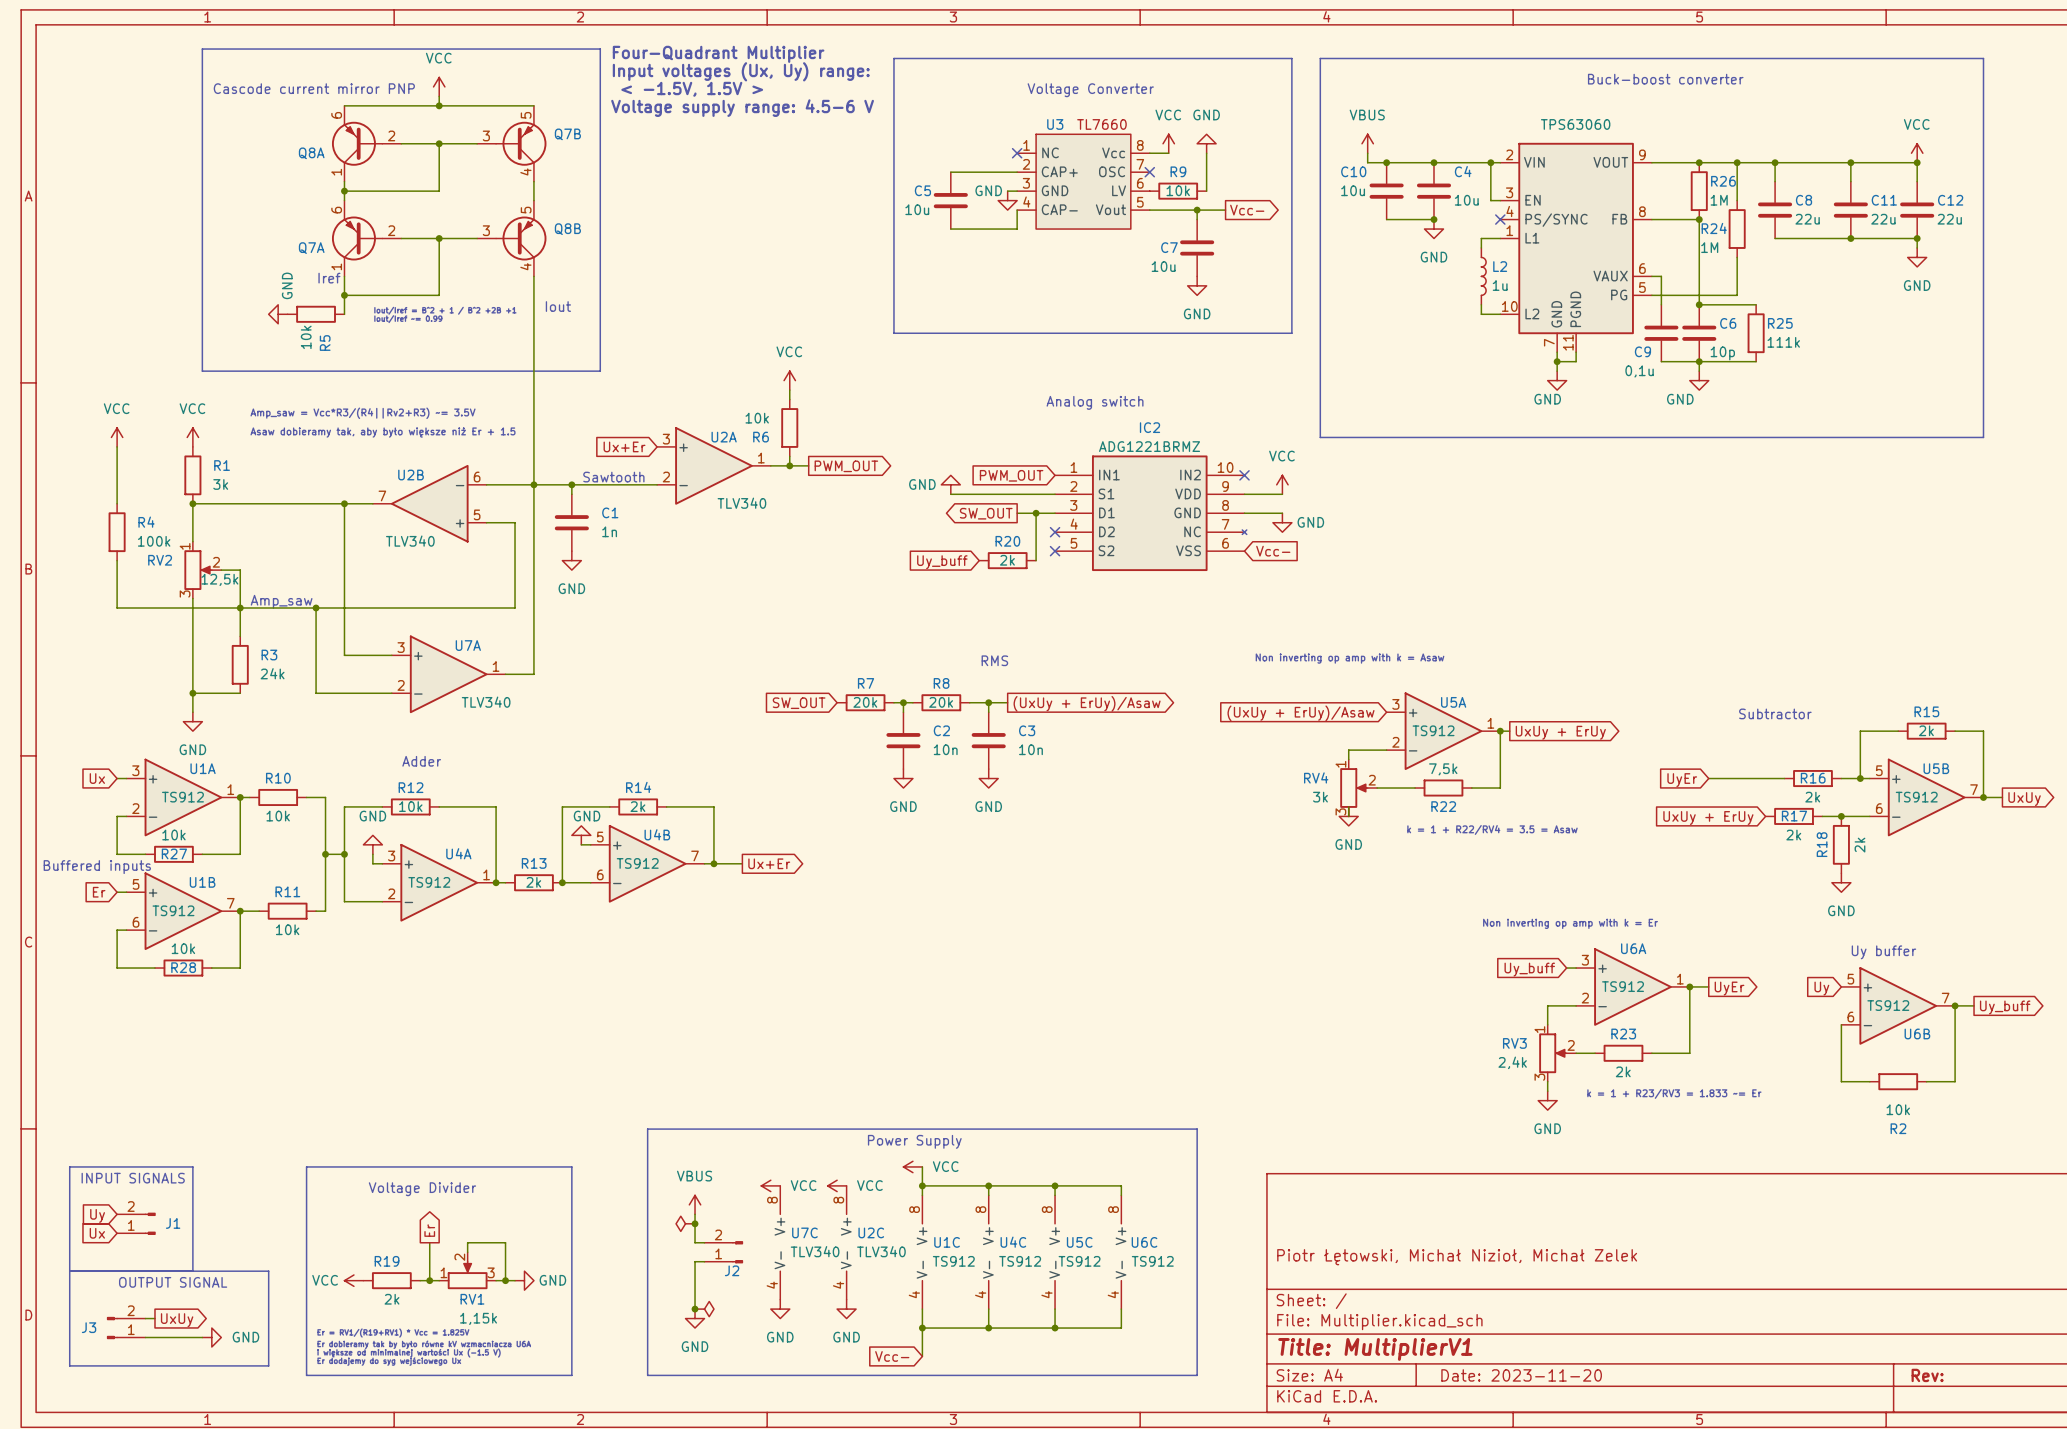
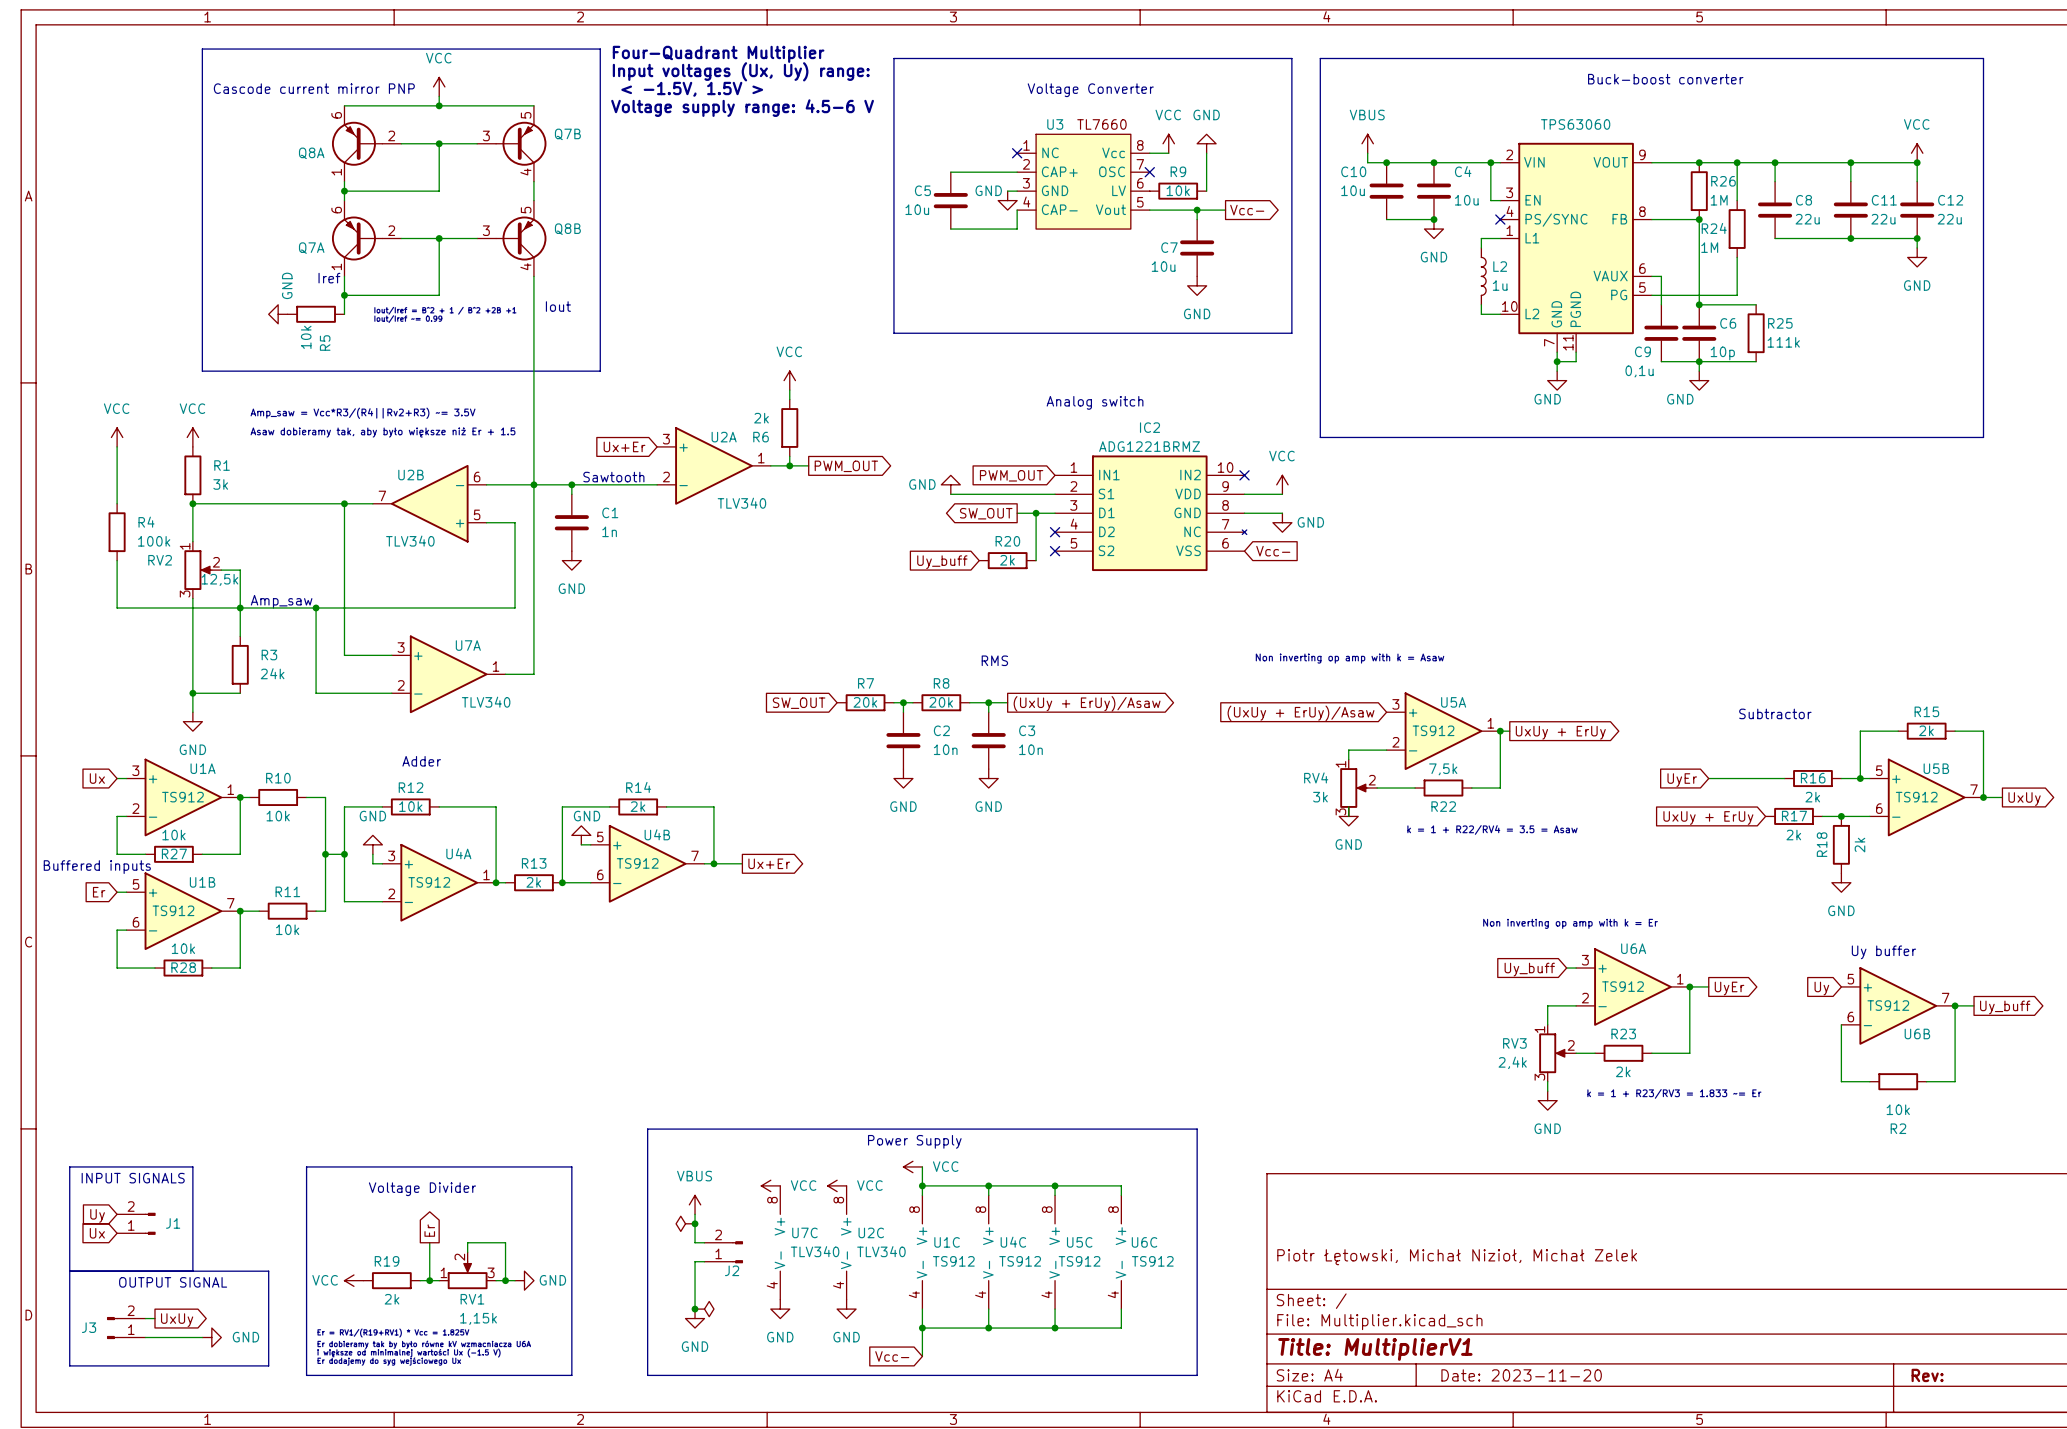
R6 value: 10k (757, 418) -> 2k (761, 418)

